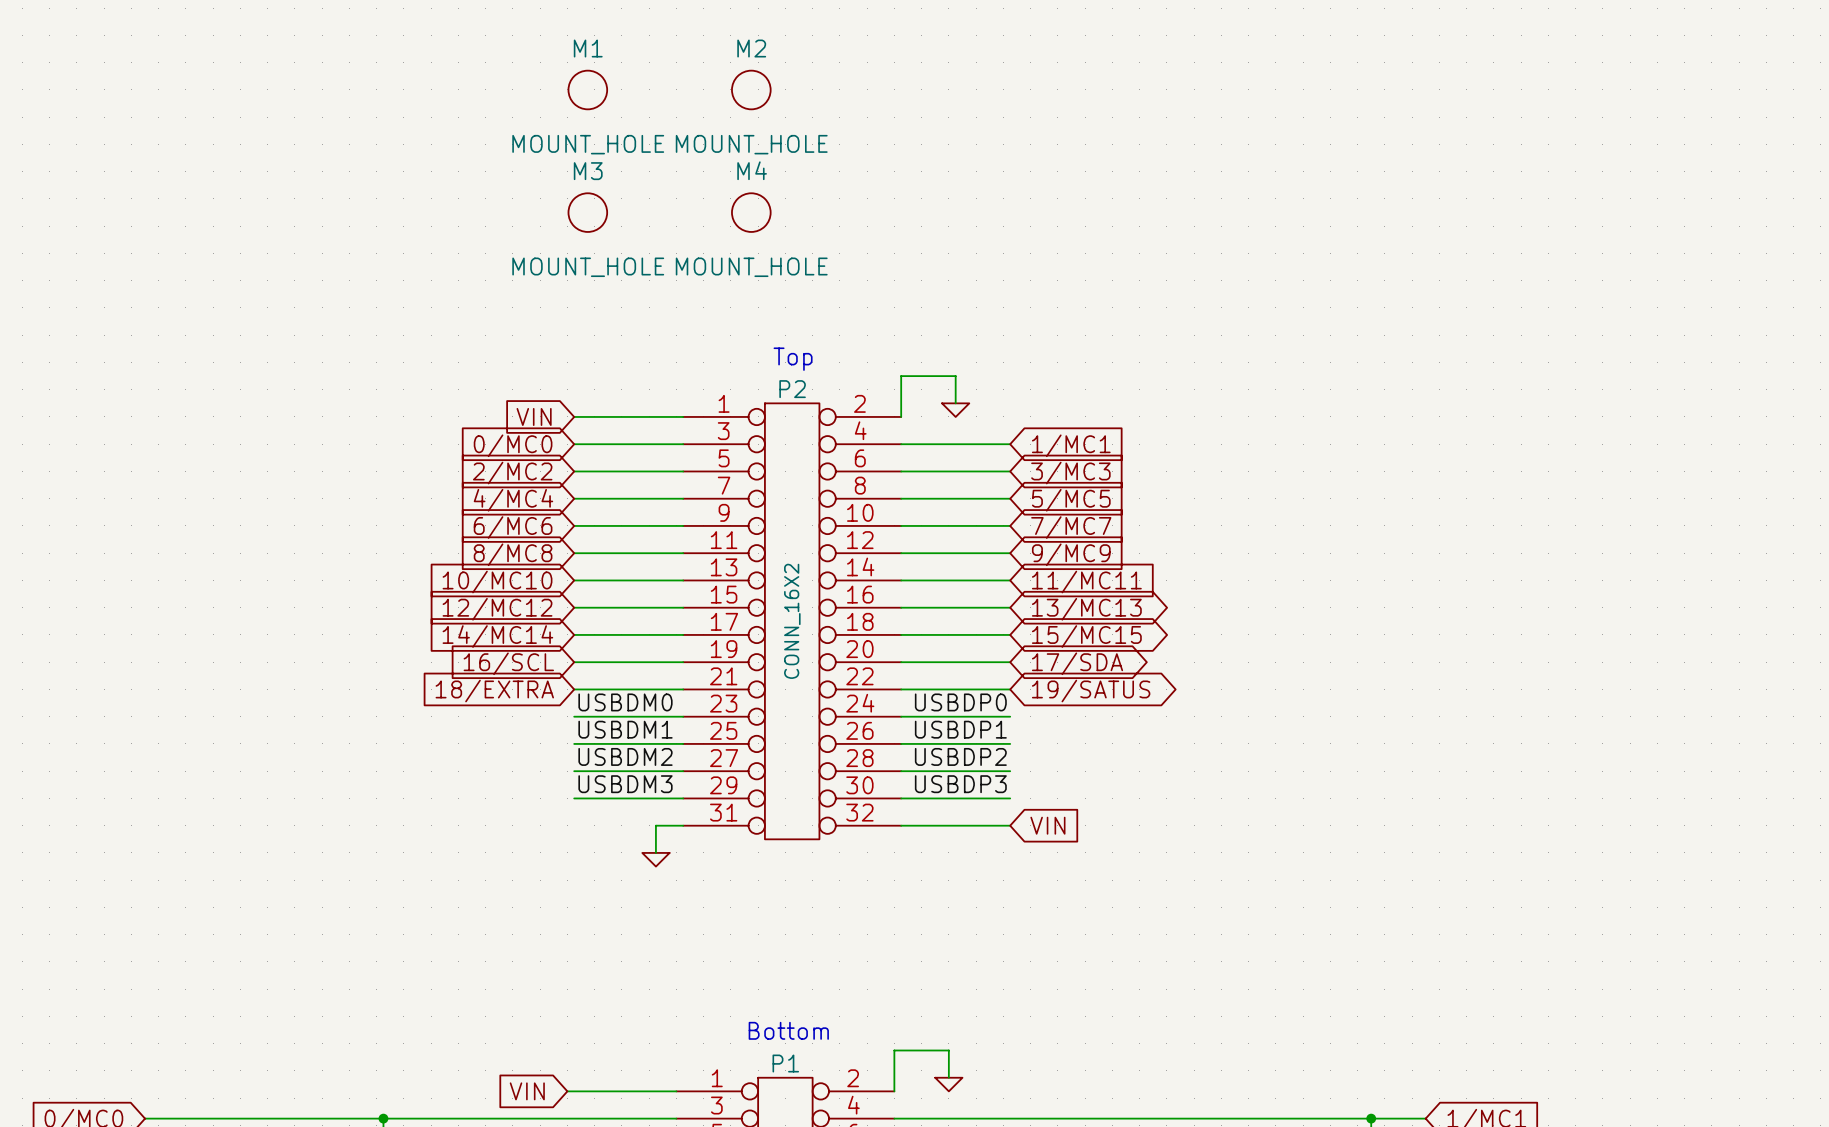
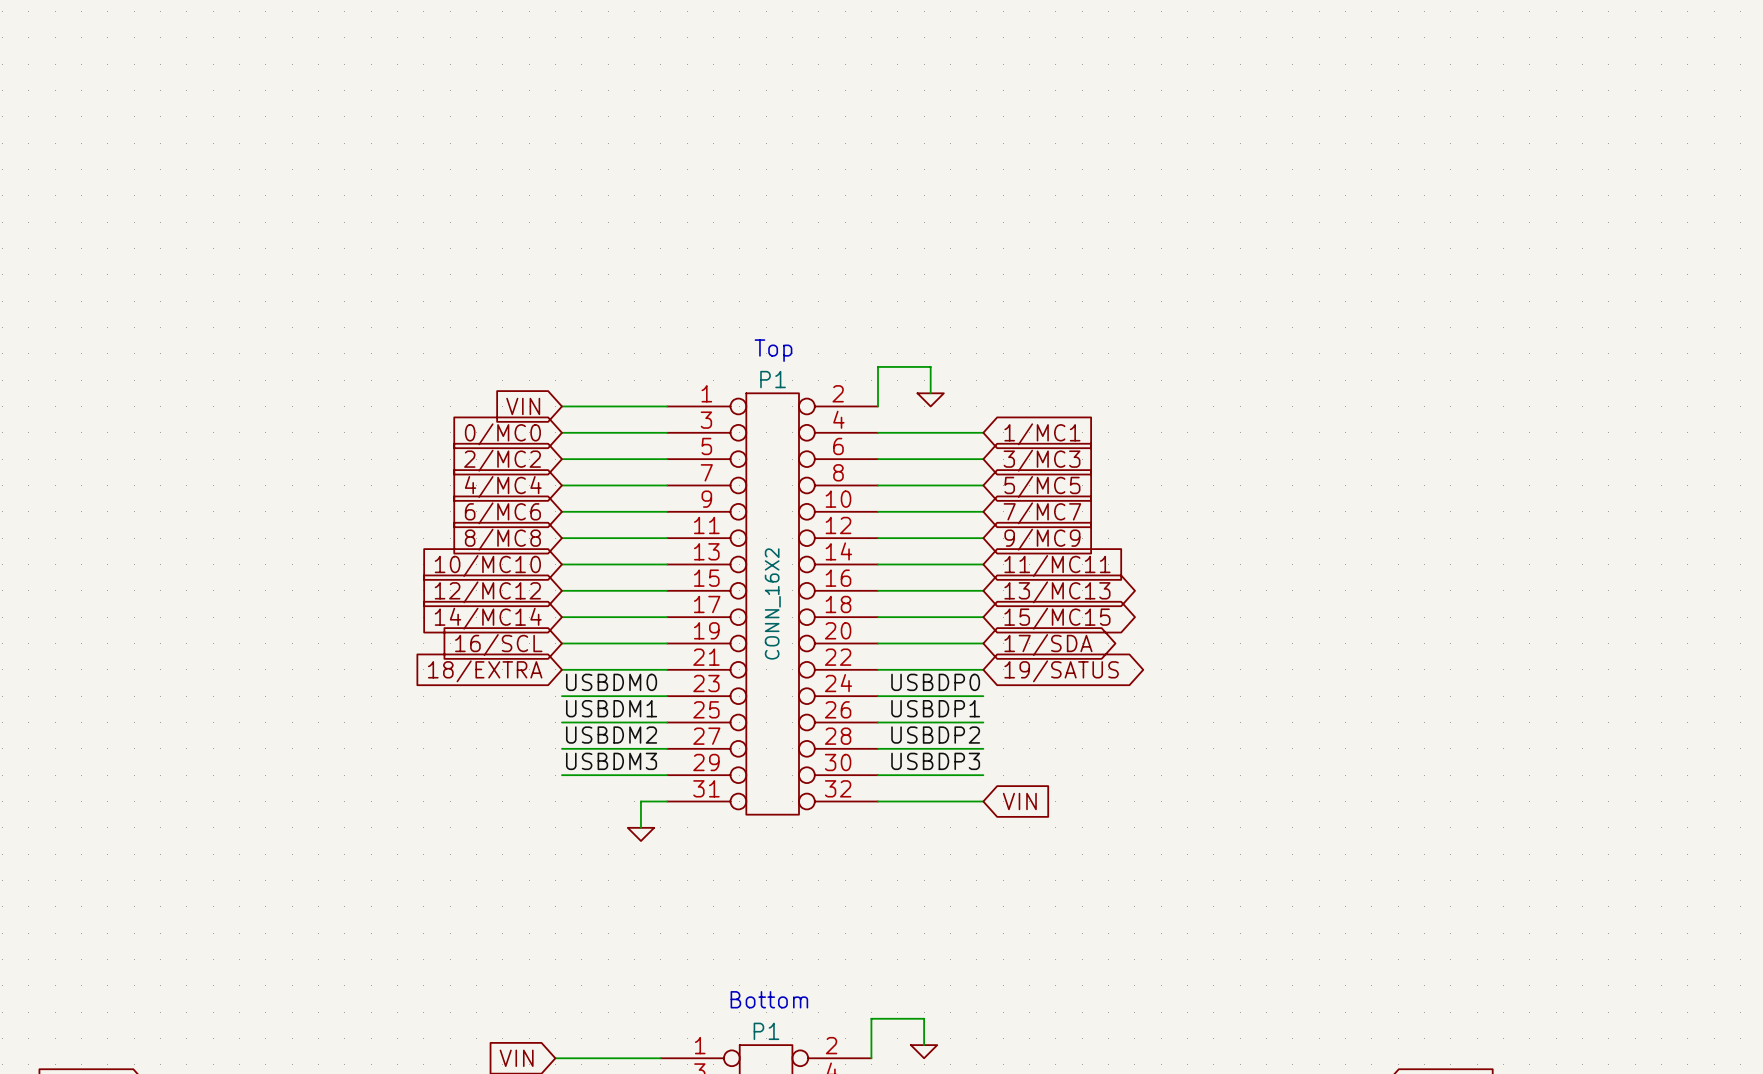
M1: MOUNT_HOLE (587, 89) -> none
M2: MOUNT_HOLE (751, 89) -> none
M3: MOUNT_HOLE (587, 212) -> none
M4: MOUNT_HOLE (751, 212) -> none
P2 name: P2 (792, 389) -> P1 (773, 379)

